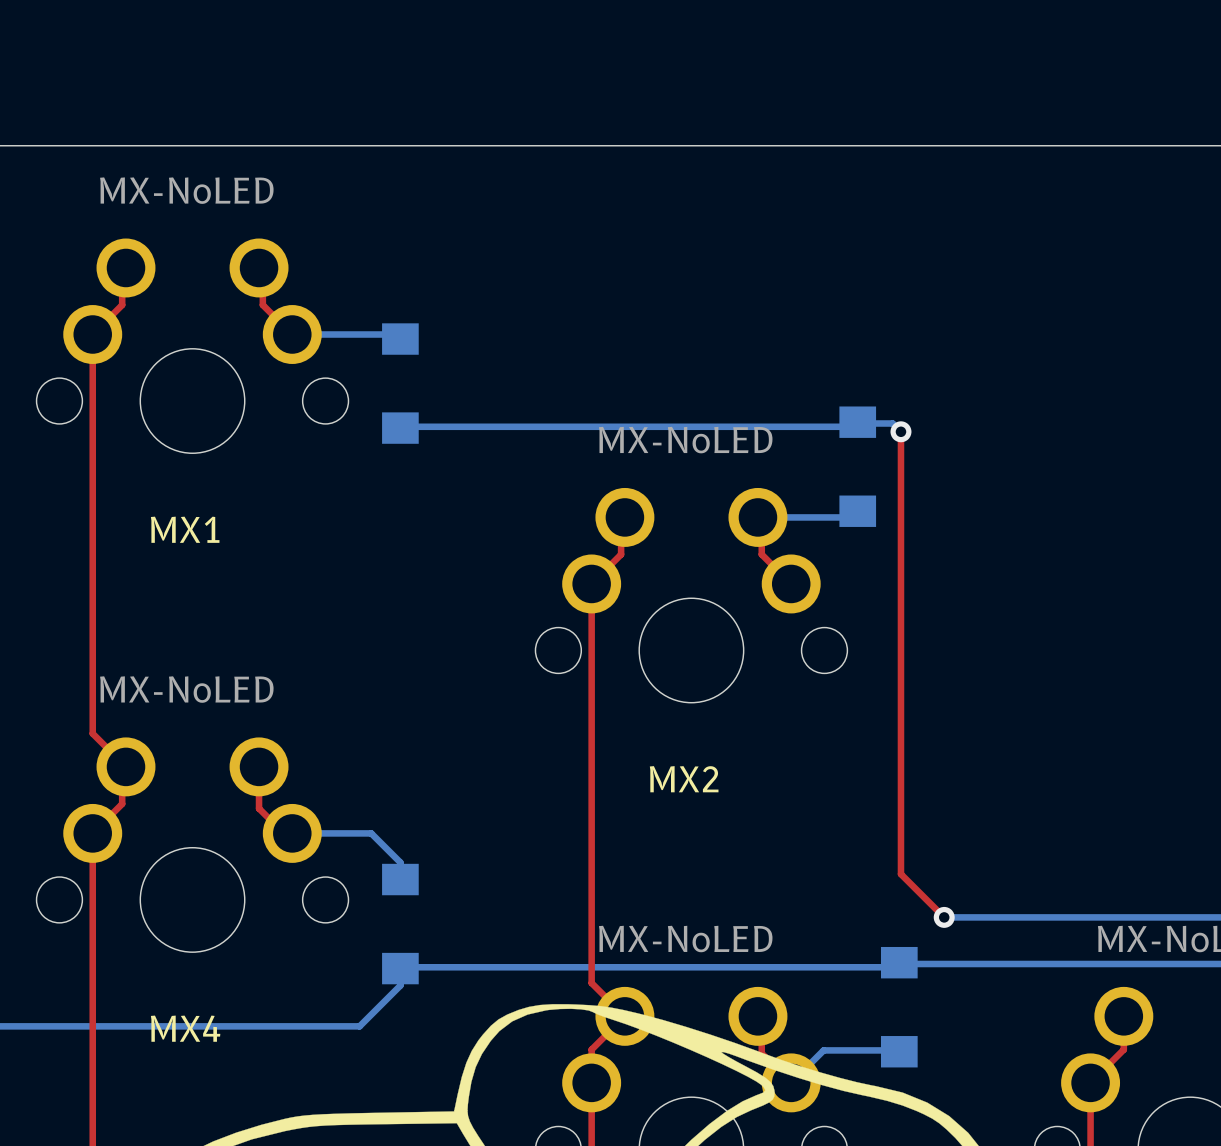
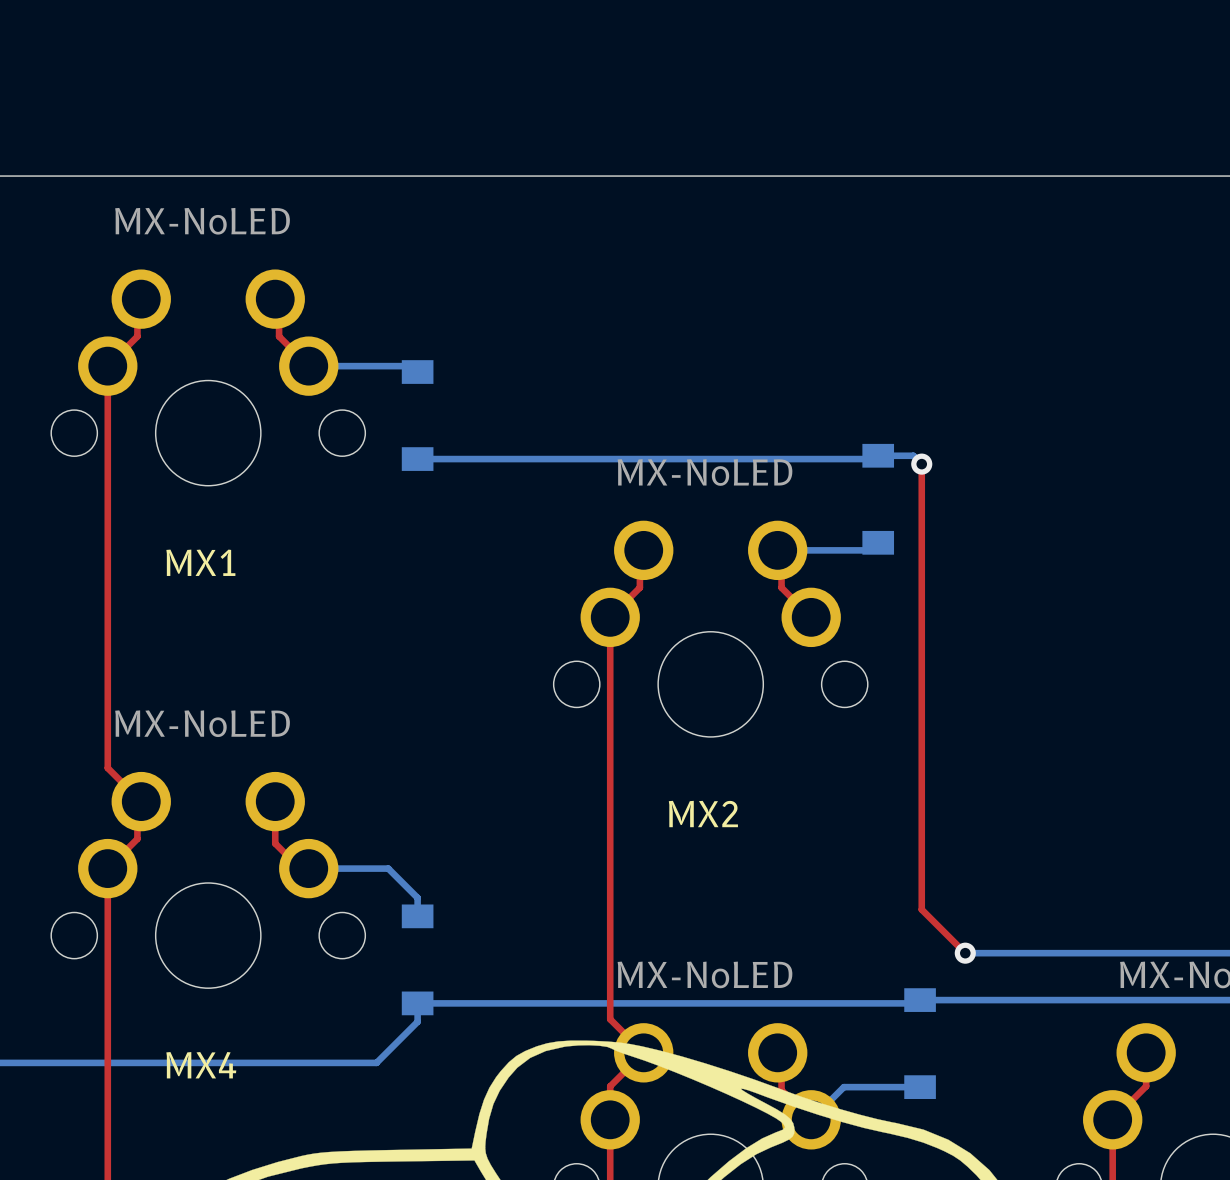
part footprint: [382, 323, 419, 444] -> [401, 360, 434, 471]
part footprint: [839, 406, 877, 527] -> [862, 443, 895, 555]
part footprint: [382, 863, 419, 985] -> [401, 904, 434, 1016]
part footprint: [880, 946, 918, 1068] -> [904, 988, 936, 1100]

